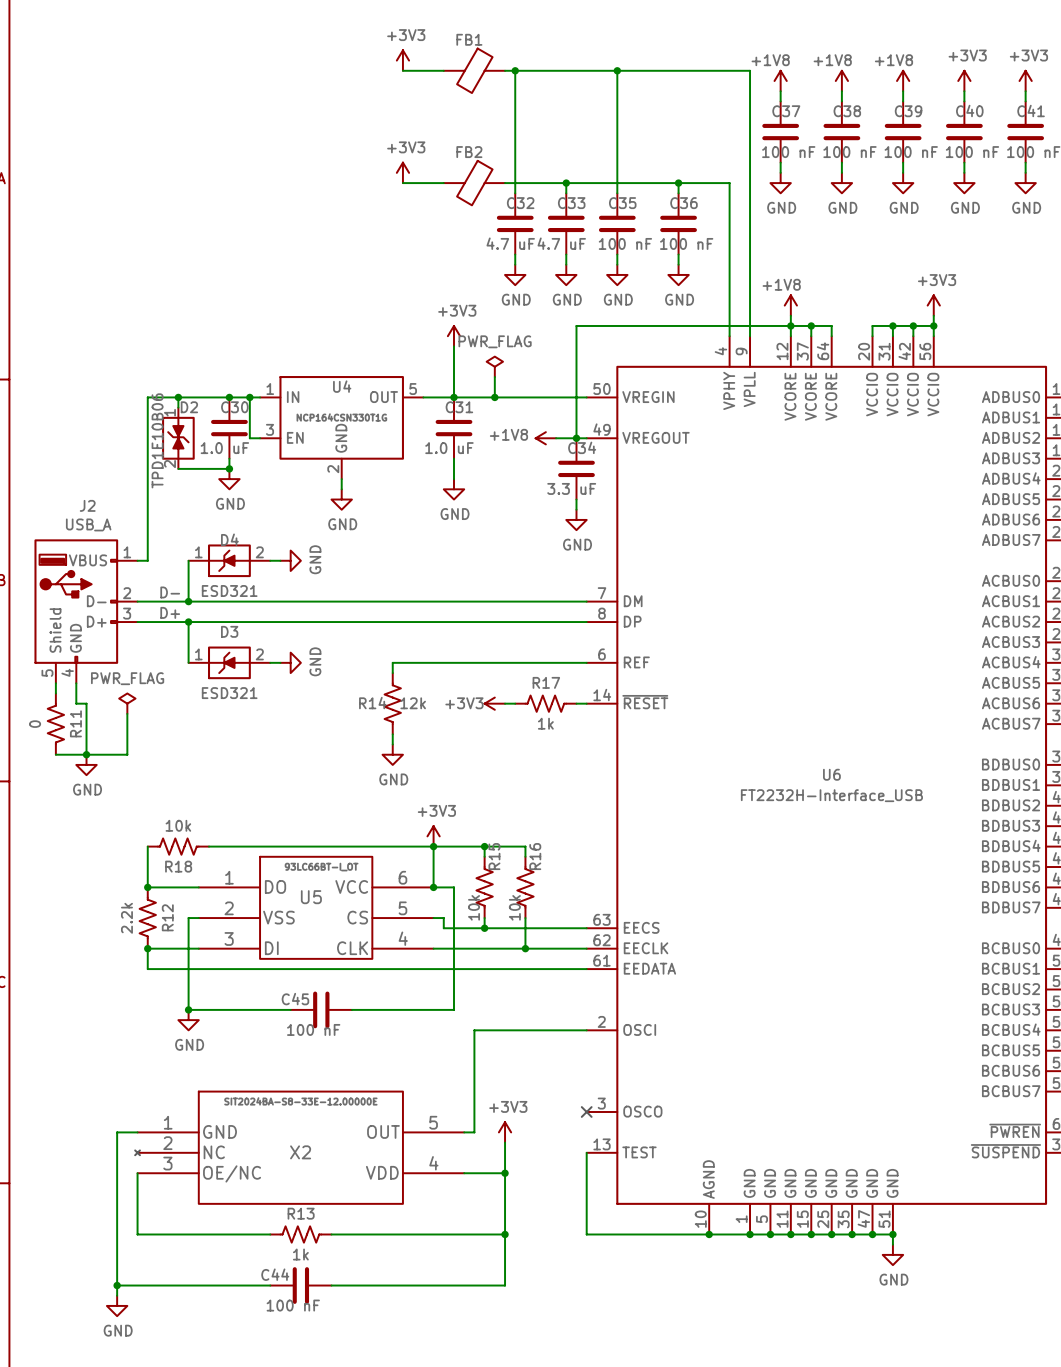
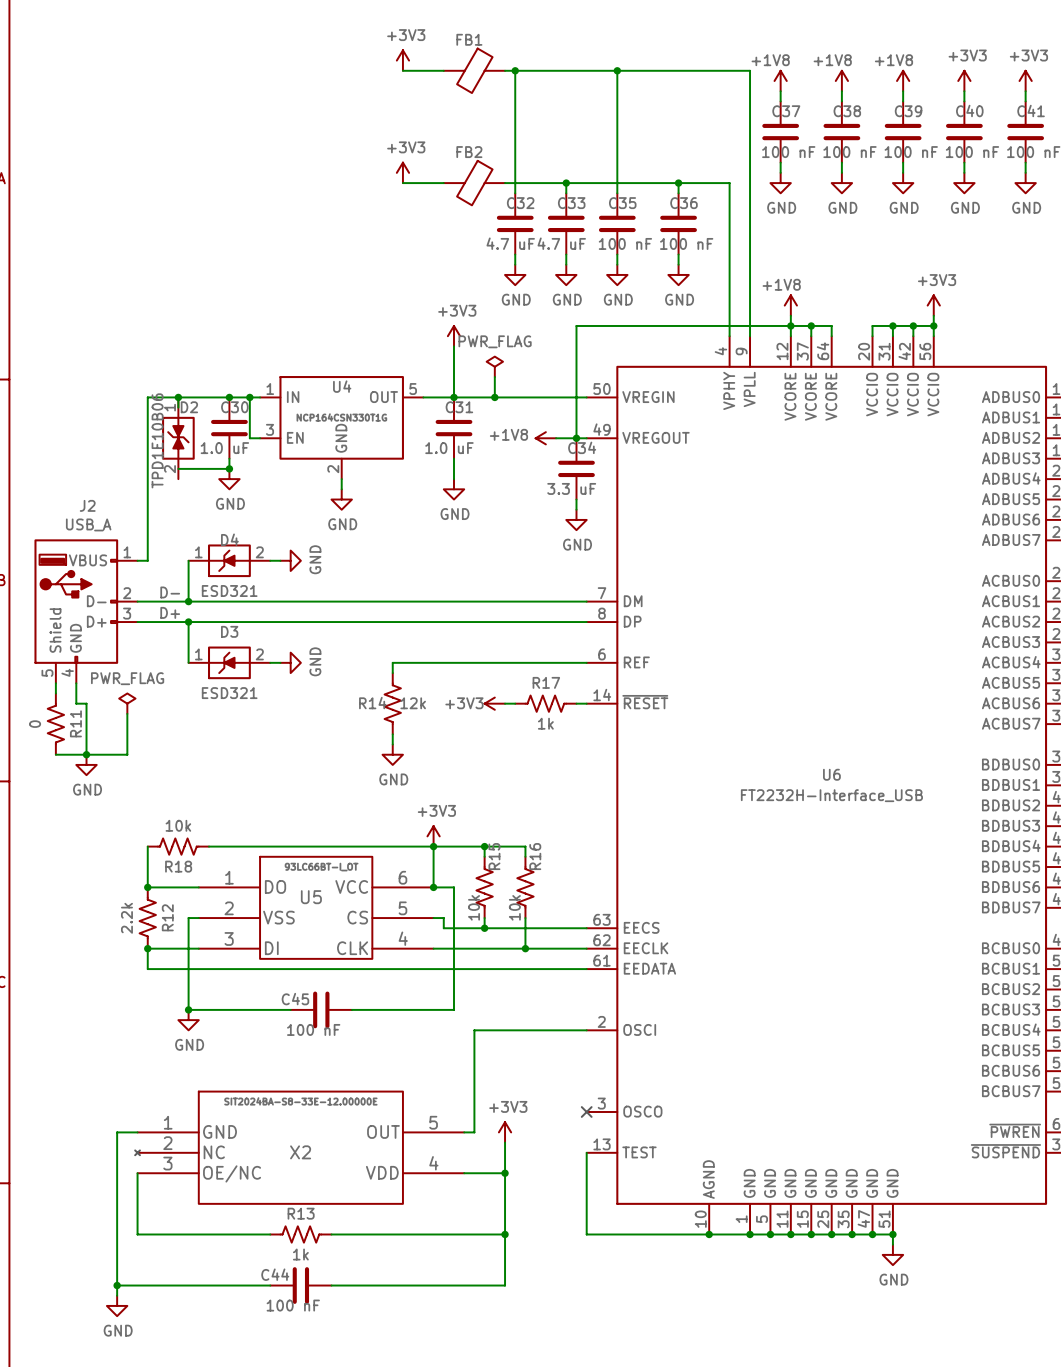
D2 symbol: [162, 407, 195, 469] -> [162, 397, 195, 480]

